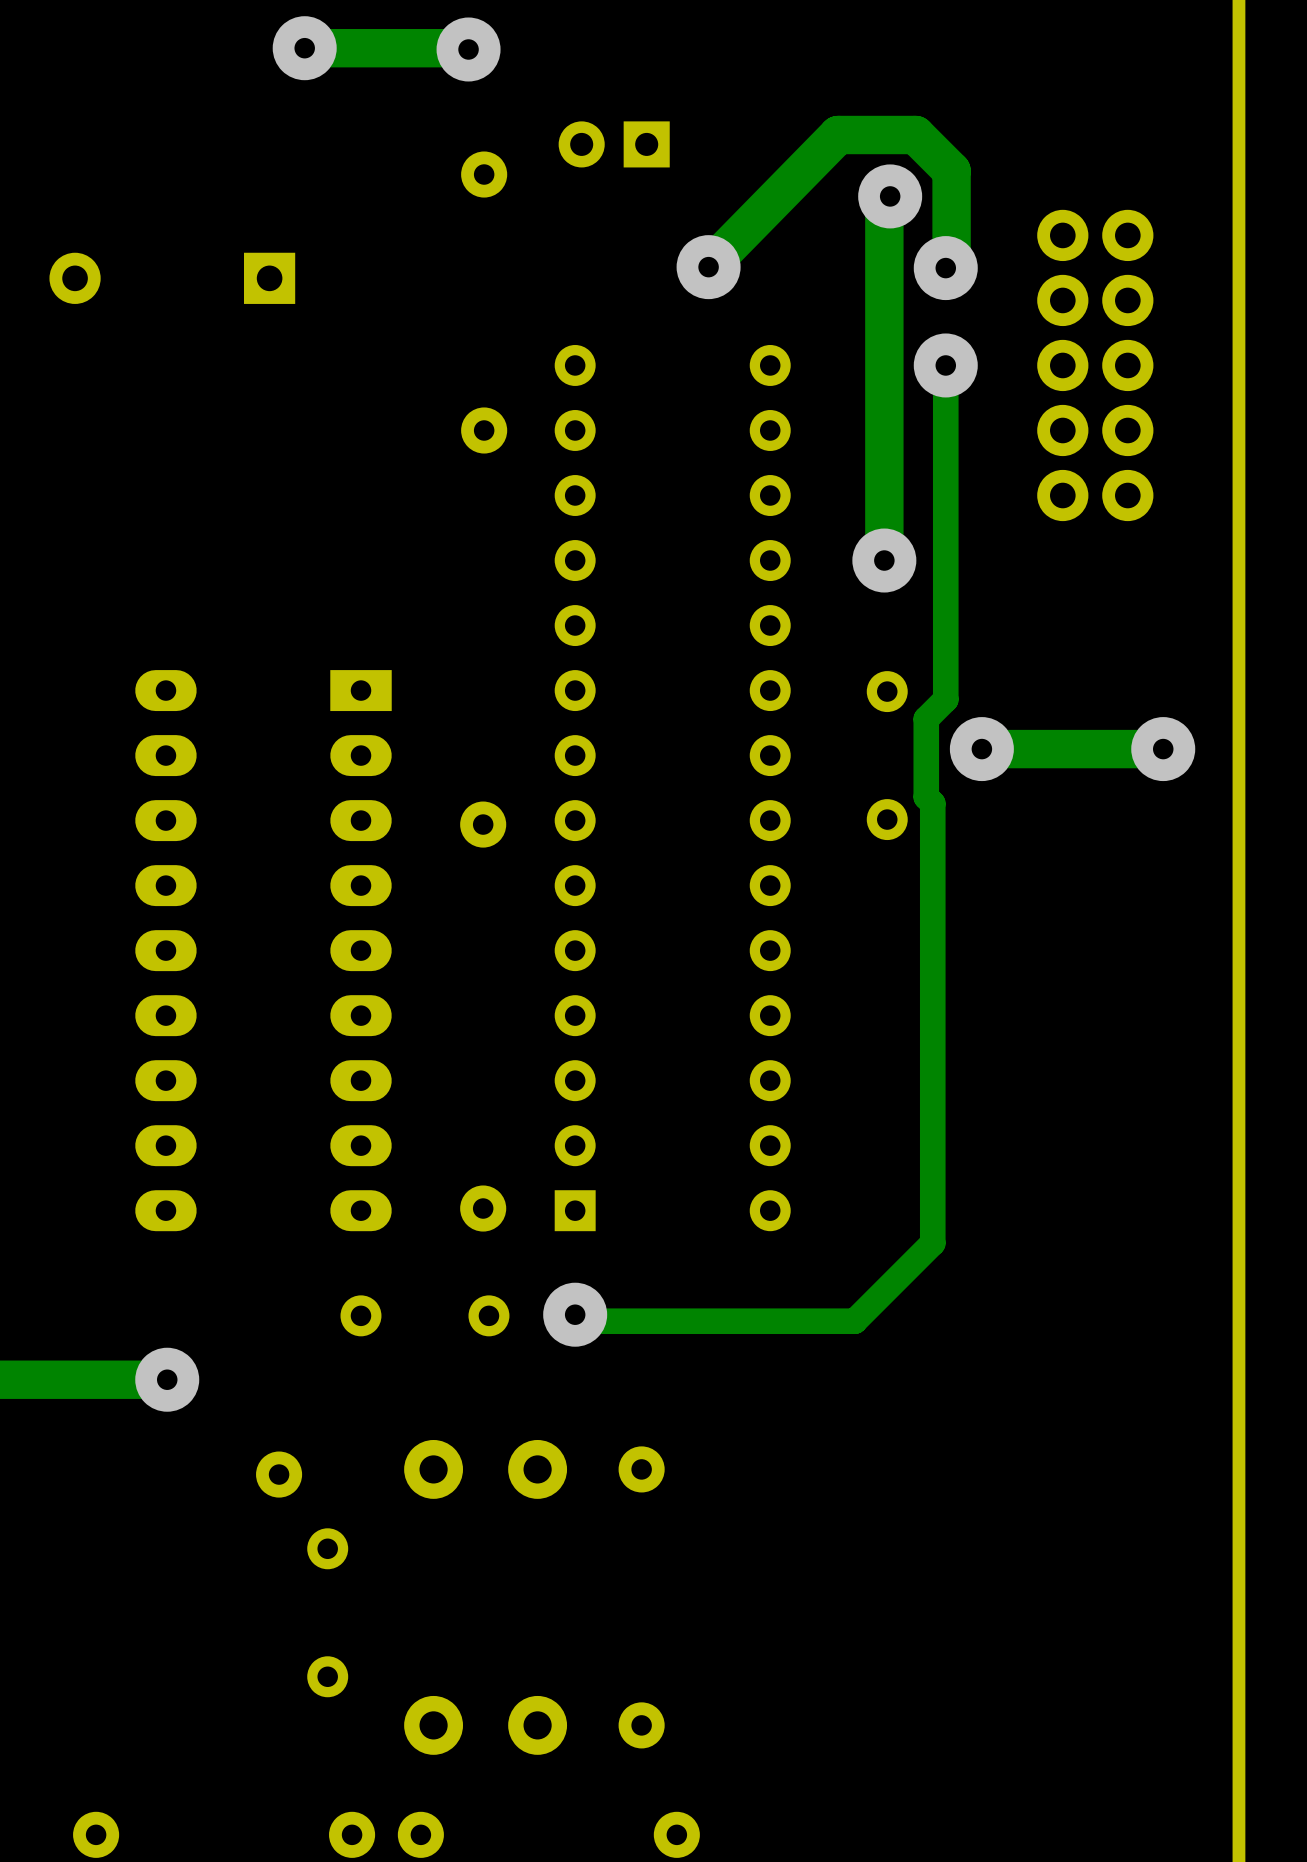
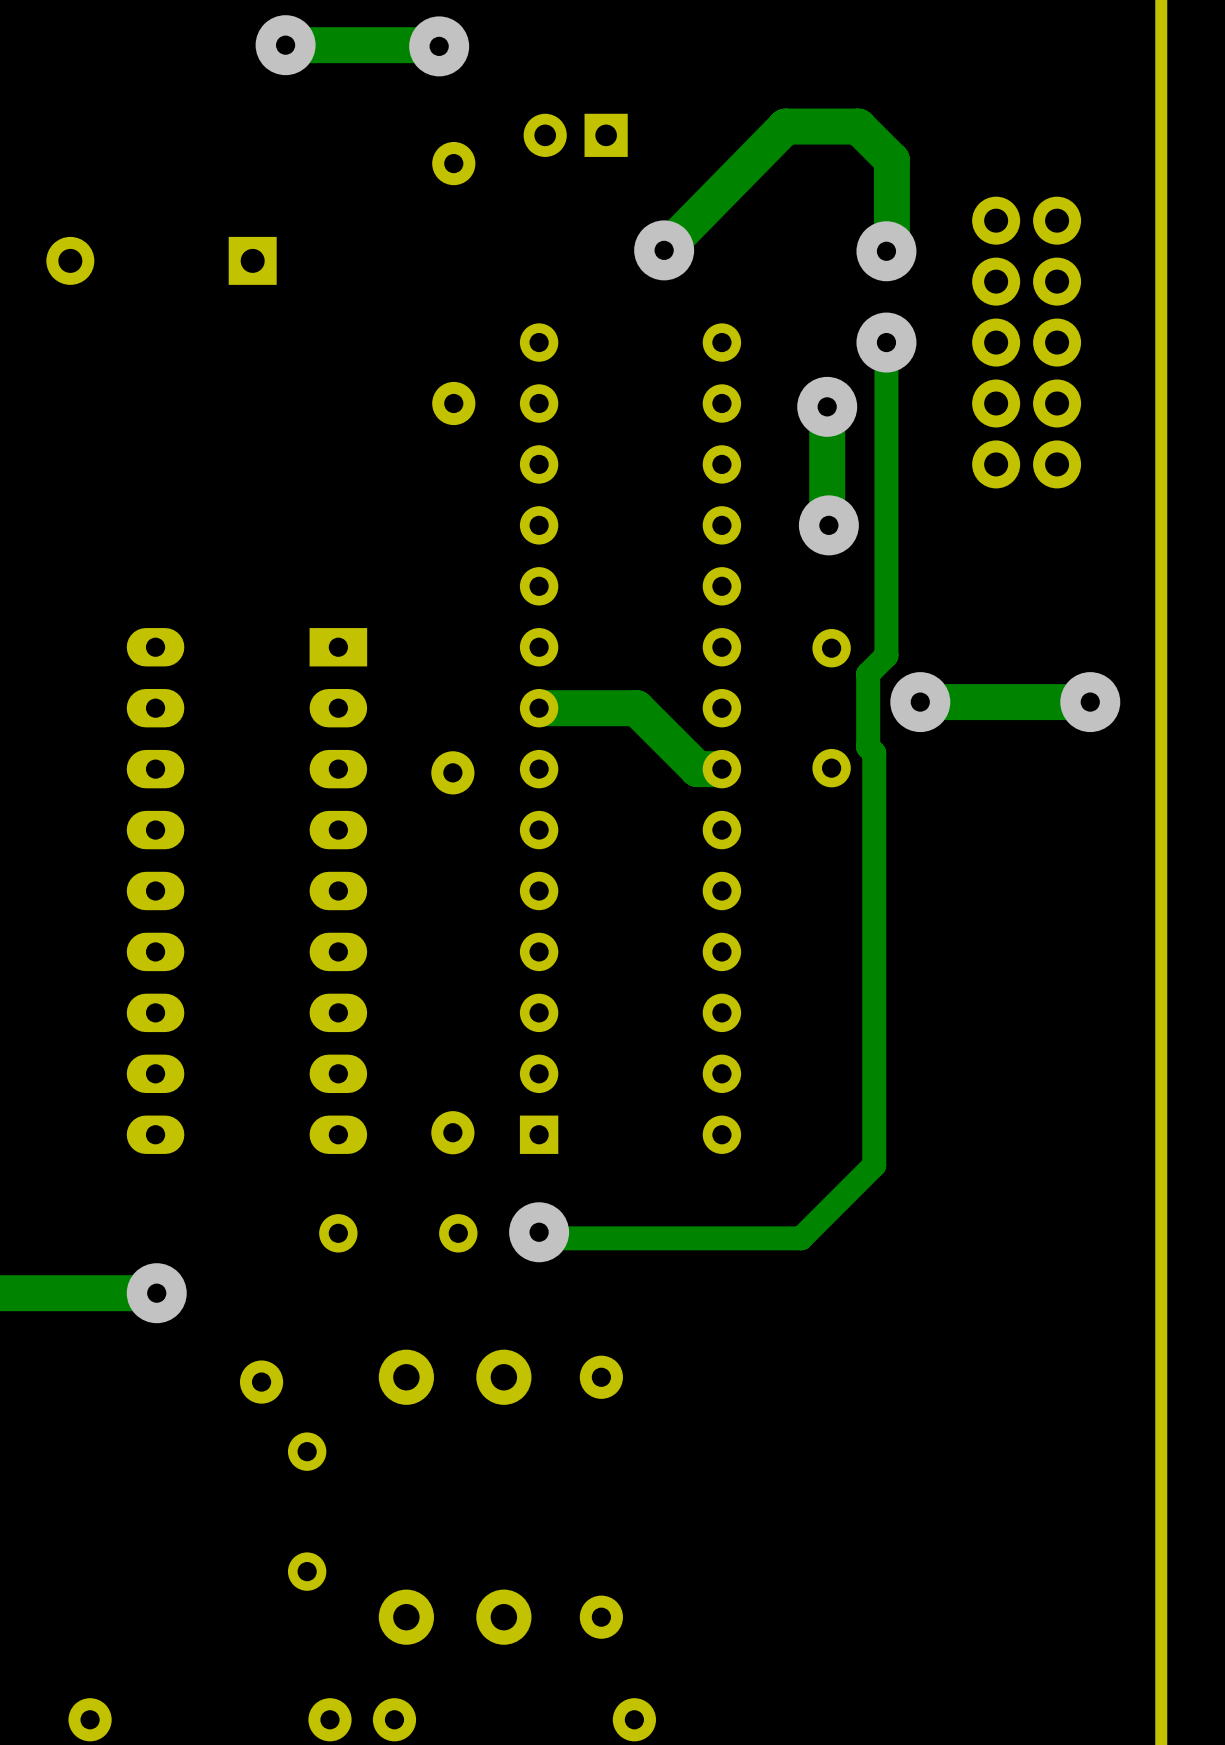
track: (890, 196) (884, 202) (884, 560) -> (827, 406) (827, 523) (828, 525)
via: (890, 196) -> none
via: none -> (827, 406)
track: none -> (539, 708) (636, 708) (697, 769) (721, 769)

